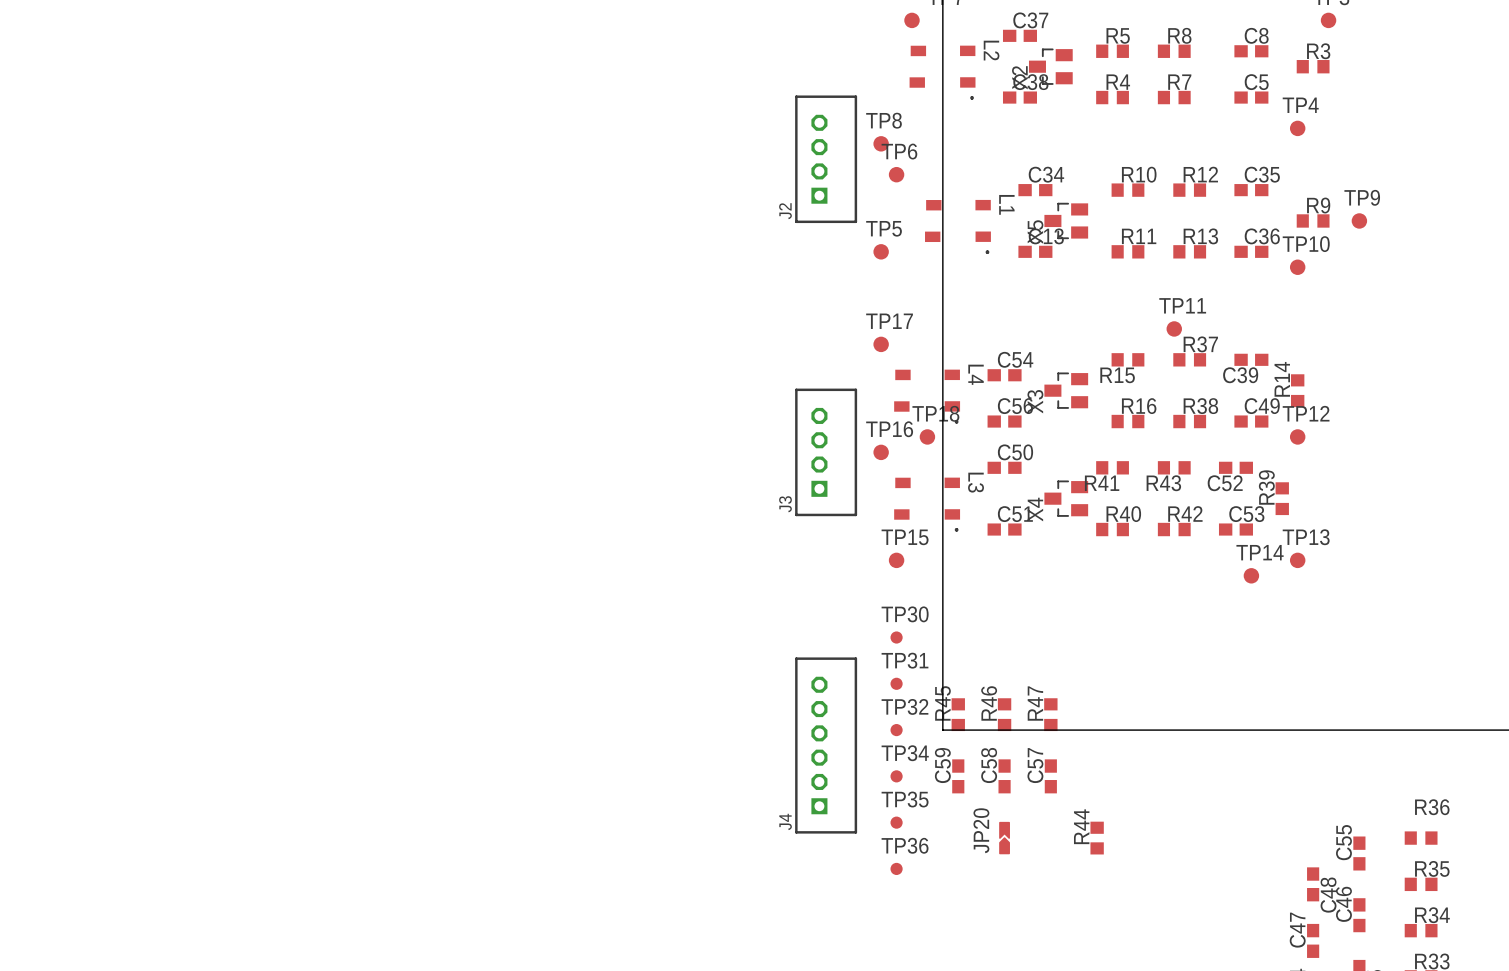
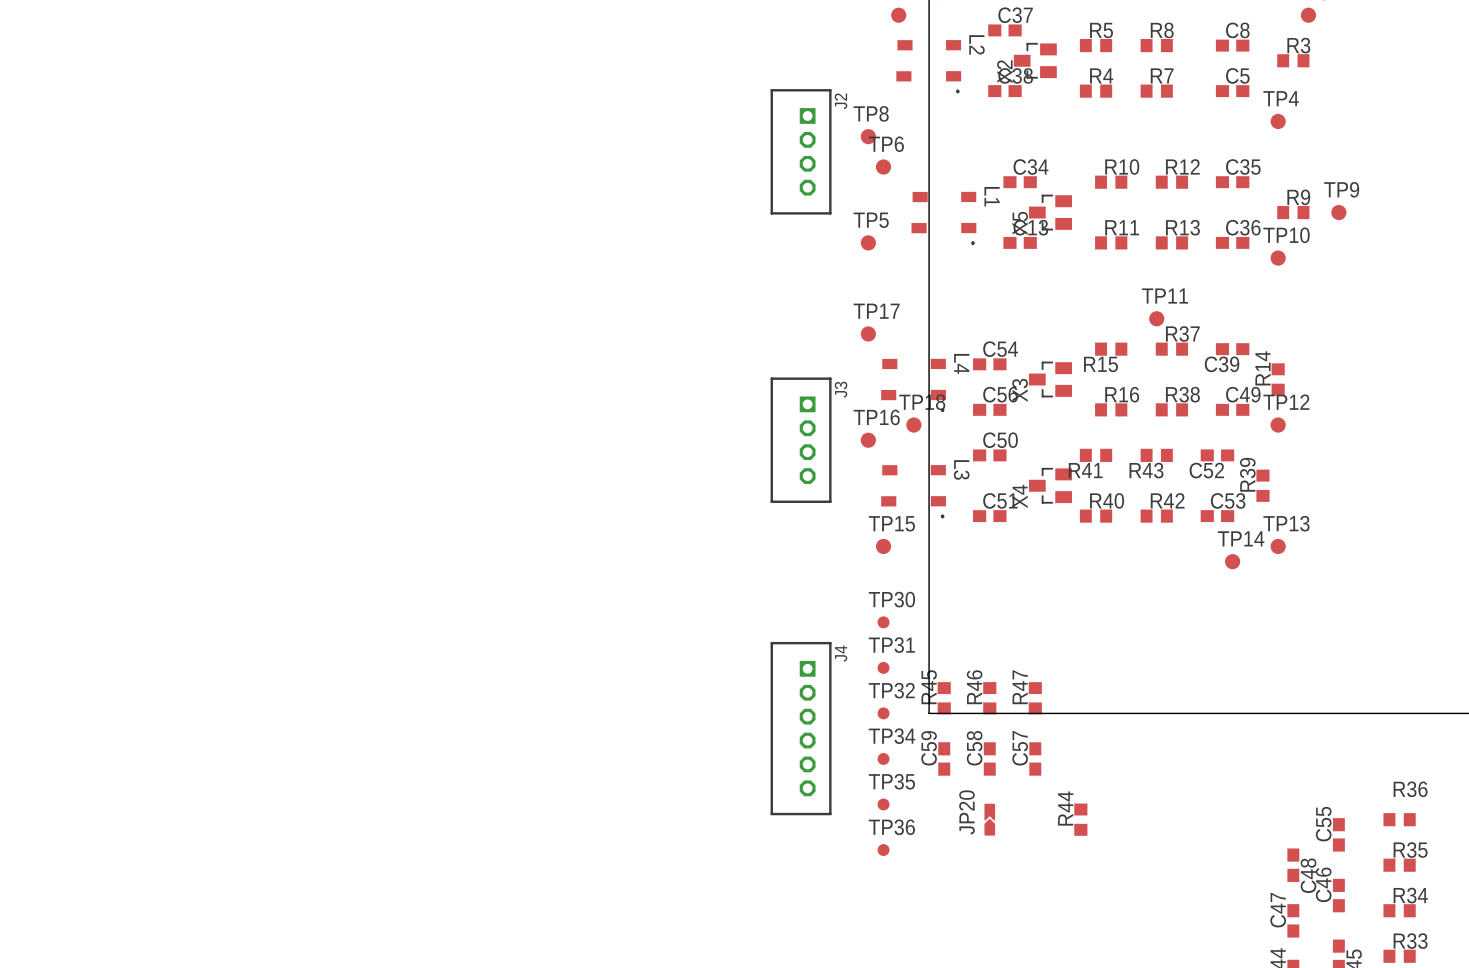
J2 rotation: 0° (826, 159) -> 180° (801, 151)
J3 rotation: 0° (826, 452) -> 180° (801, 440)
J4 rotation: 0° (826, 745) -> 180° (801, 728)

